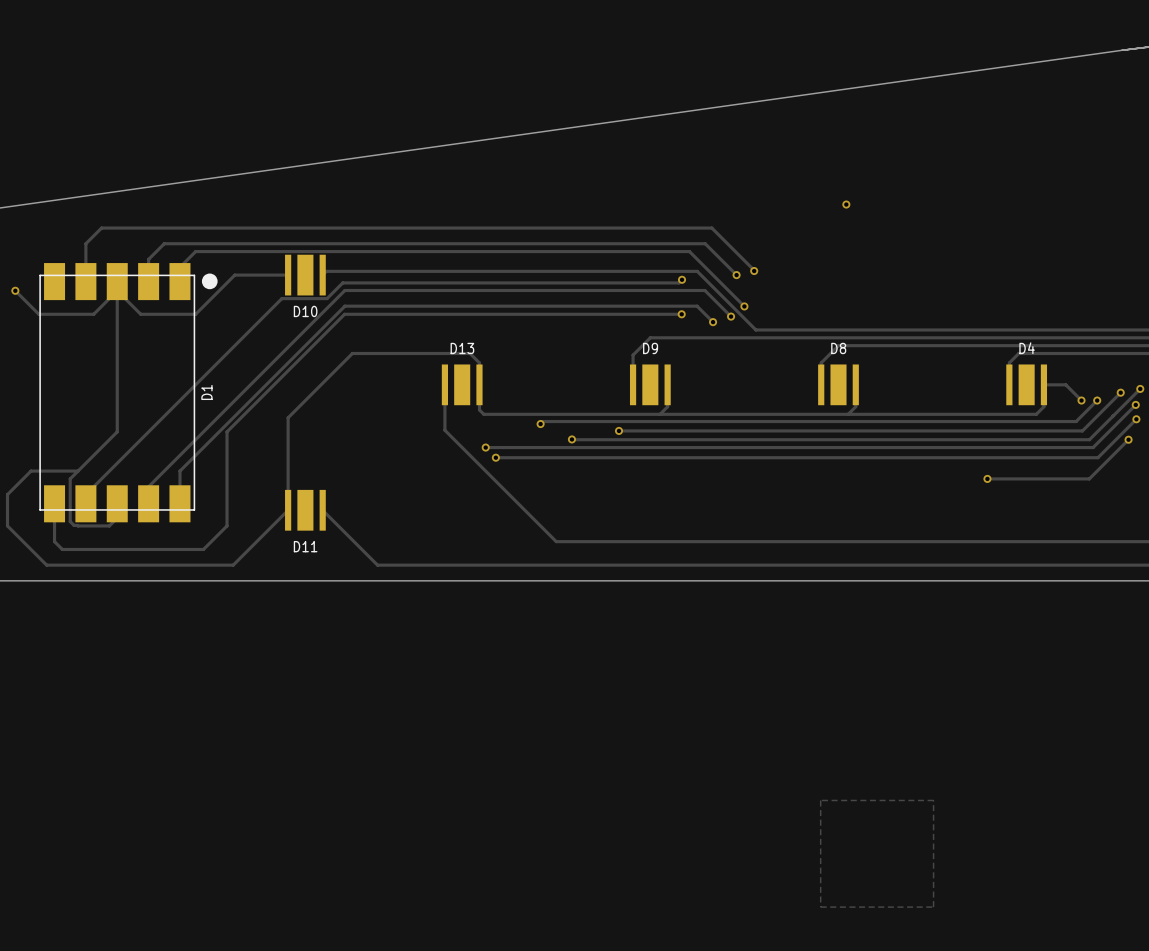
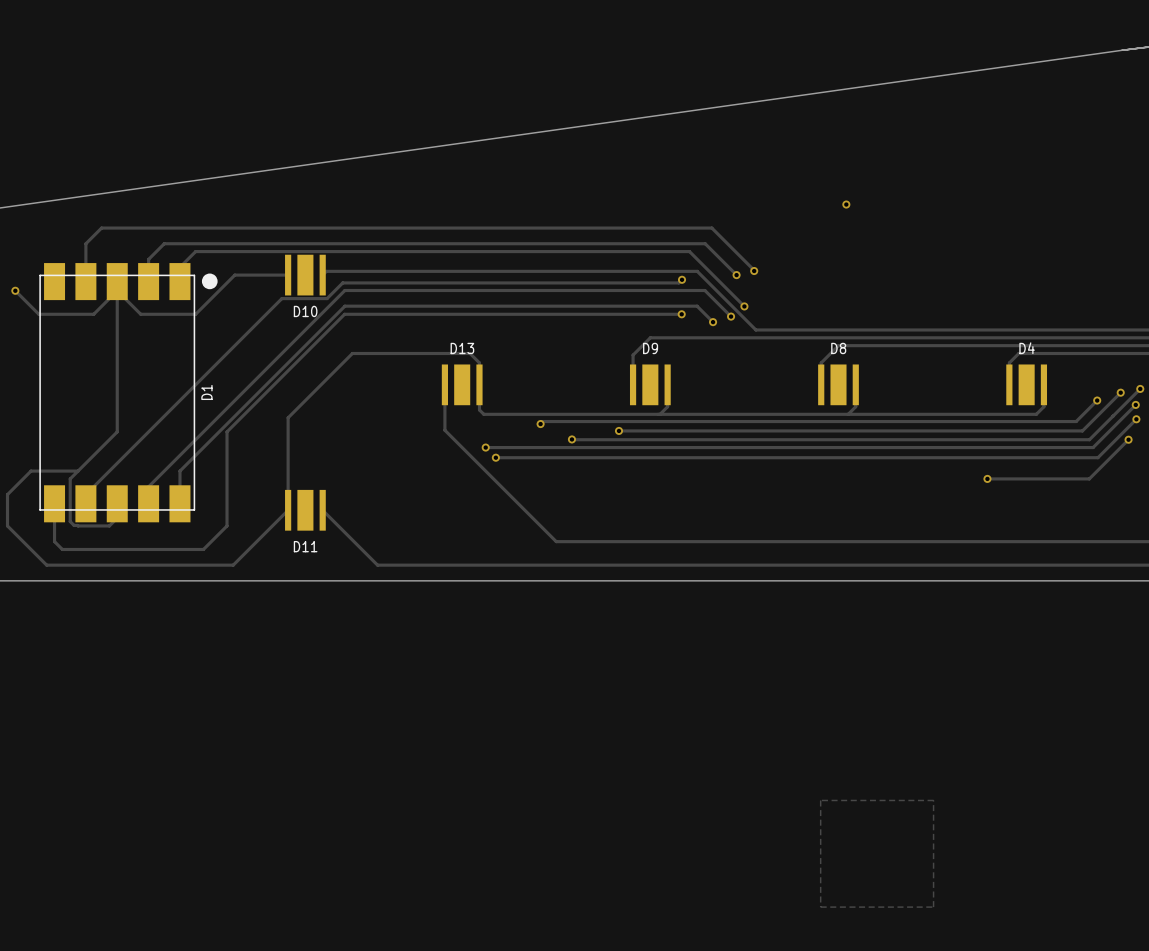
track: (1043, 384) (1065, 384) (1081, 400) -> none
via: (1081, 400) -> none

